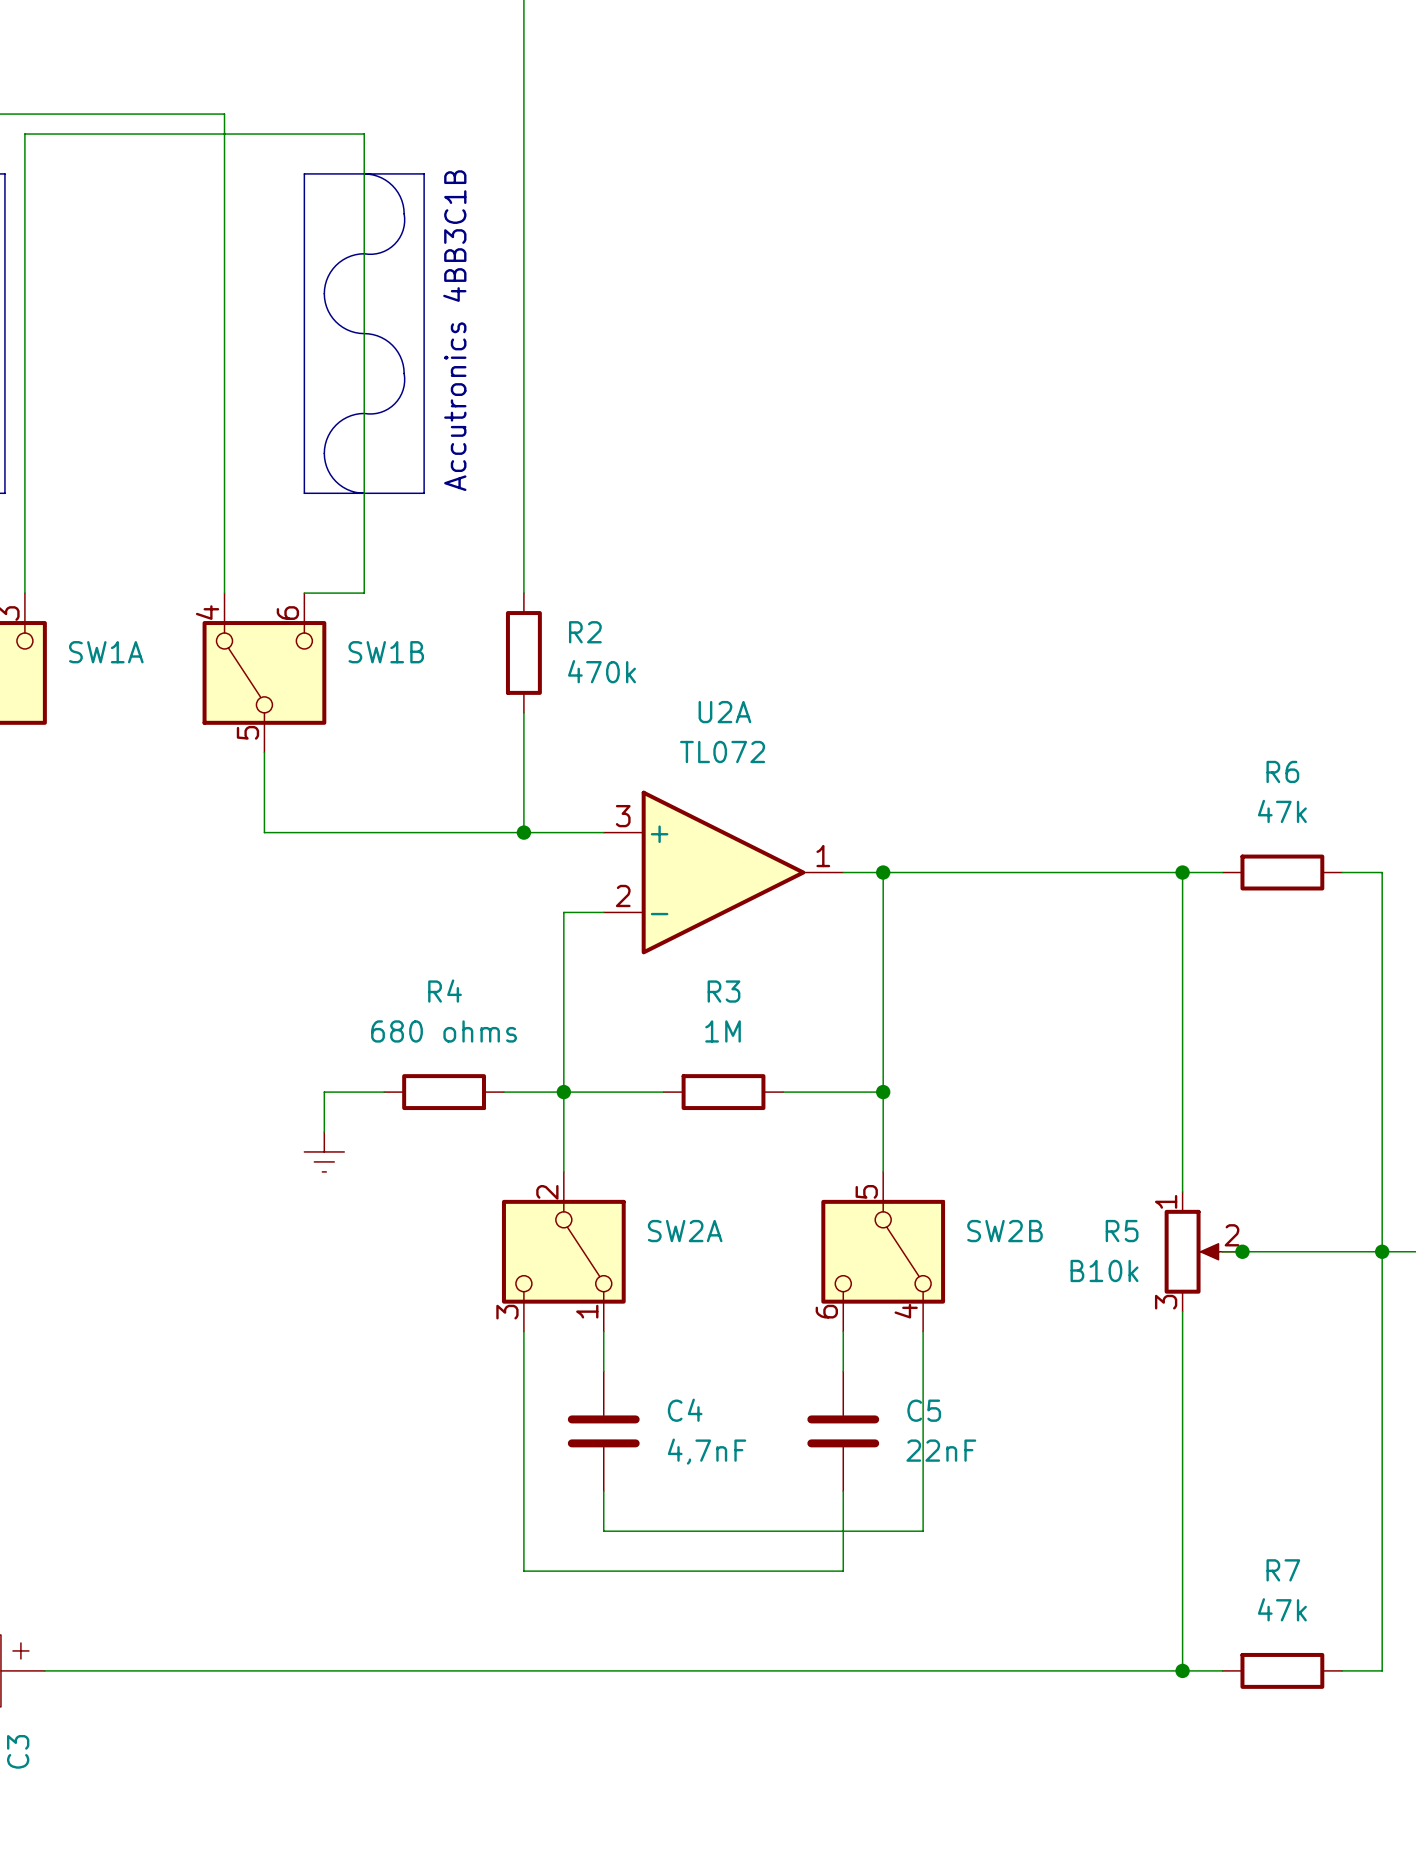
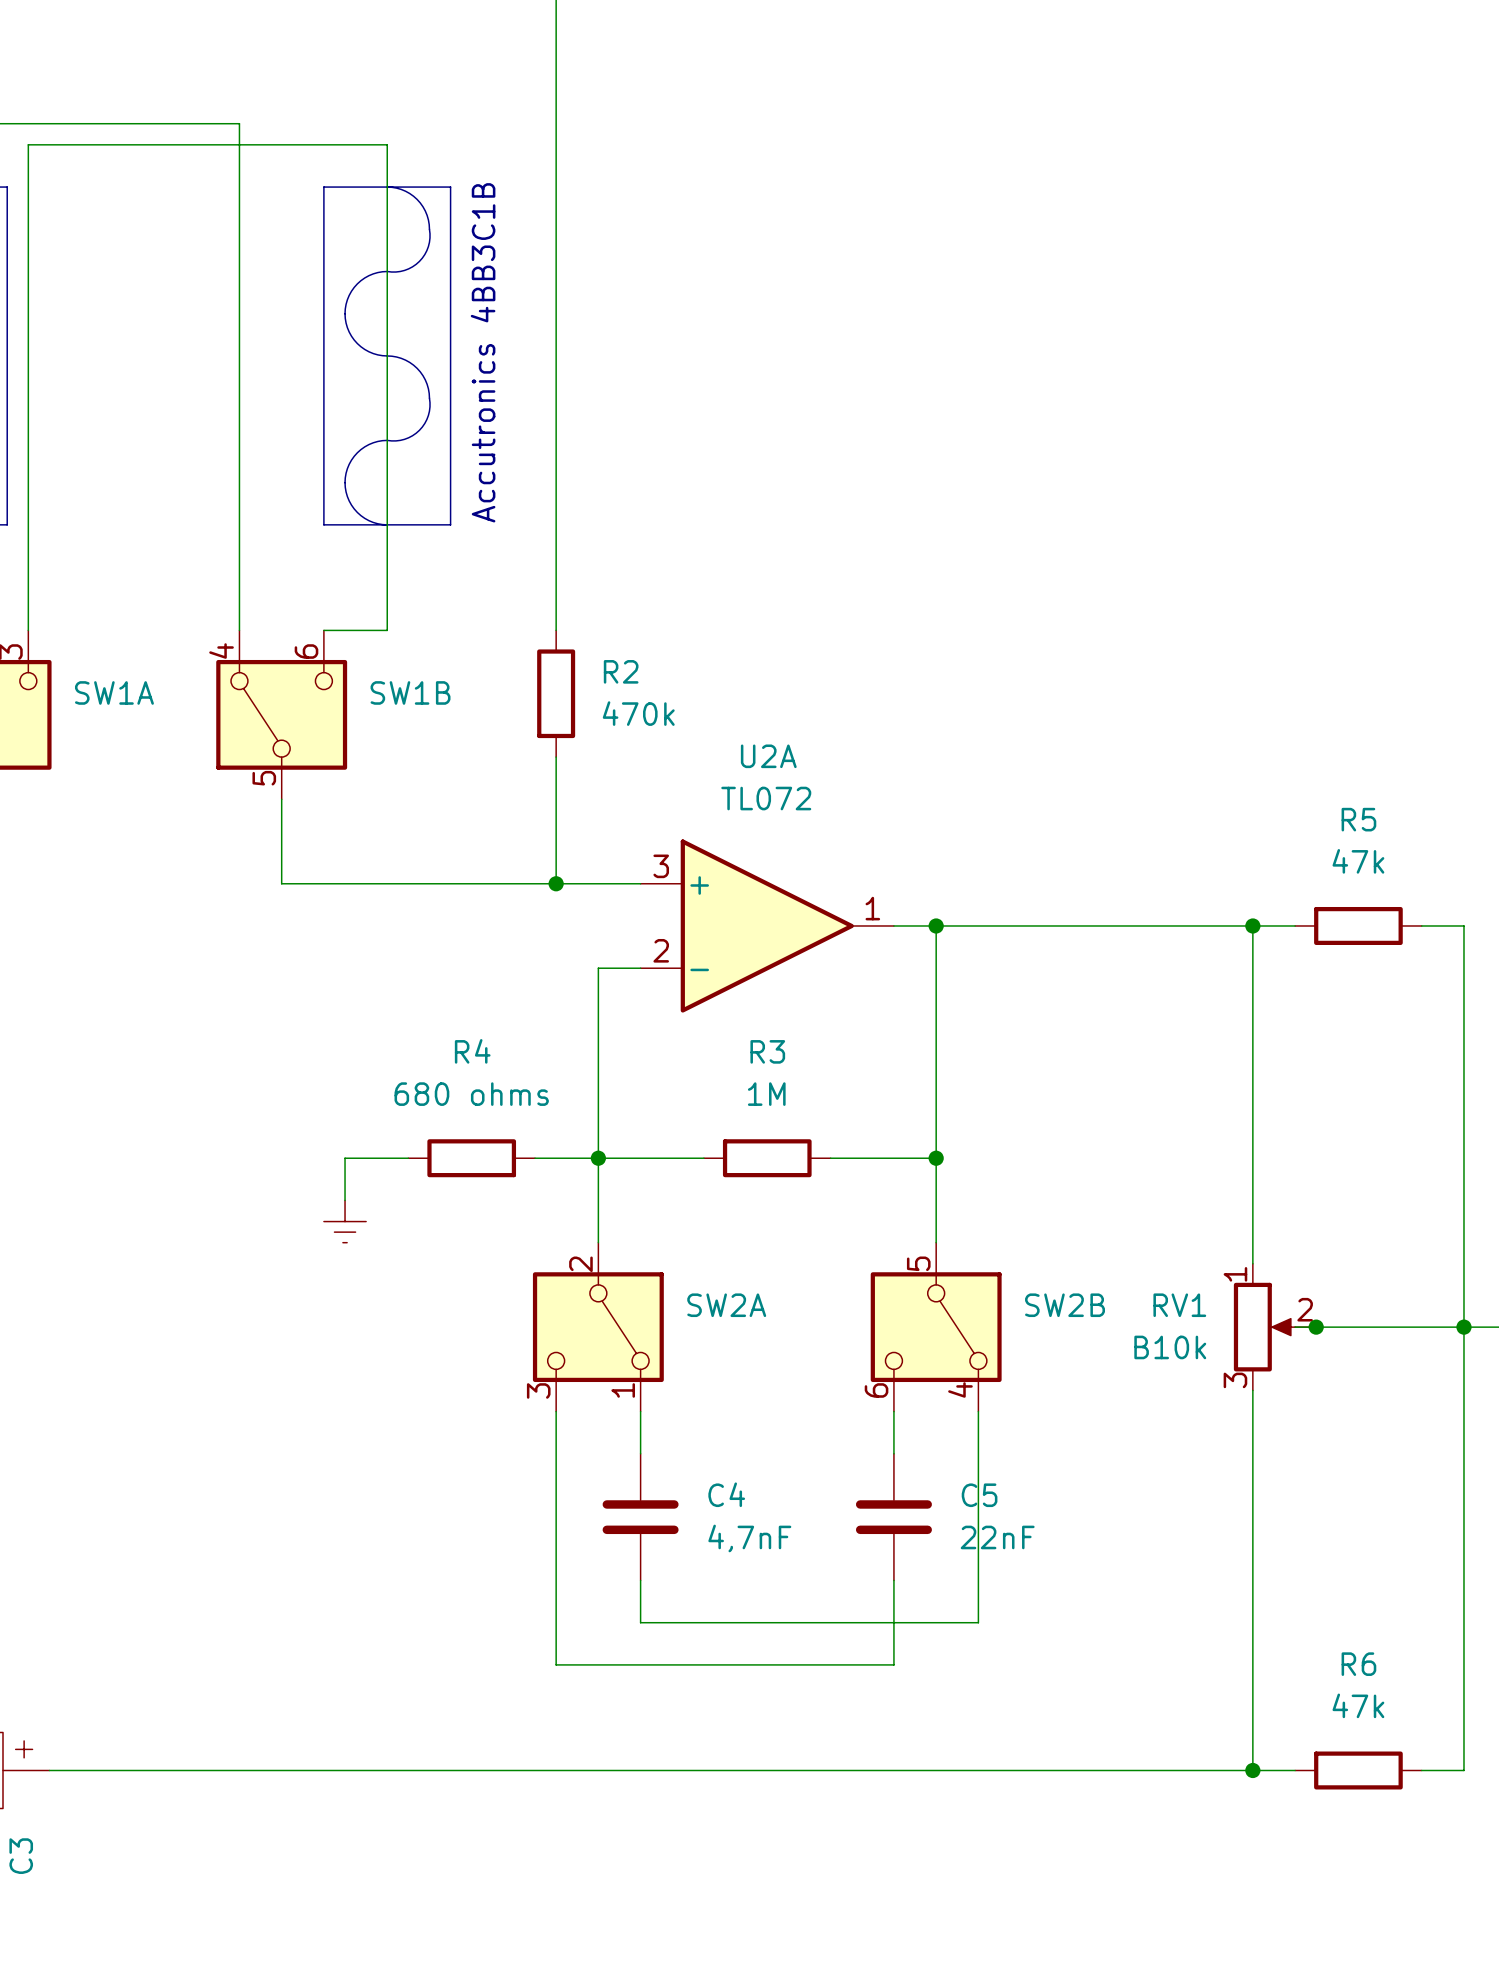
R6 name: R6 (1282, 771) -> R5 (1358, 819)
R5 name: R5 (1122, 1231) -> RV1 (1179, 1305)
R7 name: R7 (1283, 1570) -> R6 (1358, 1664)

